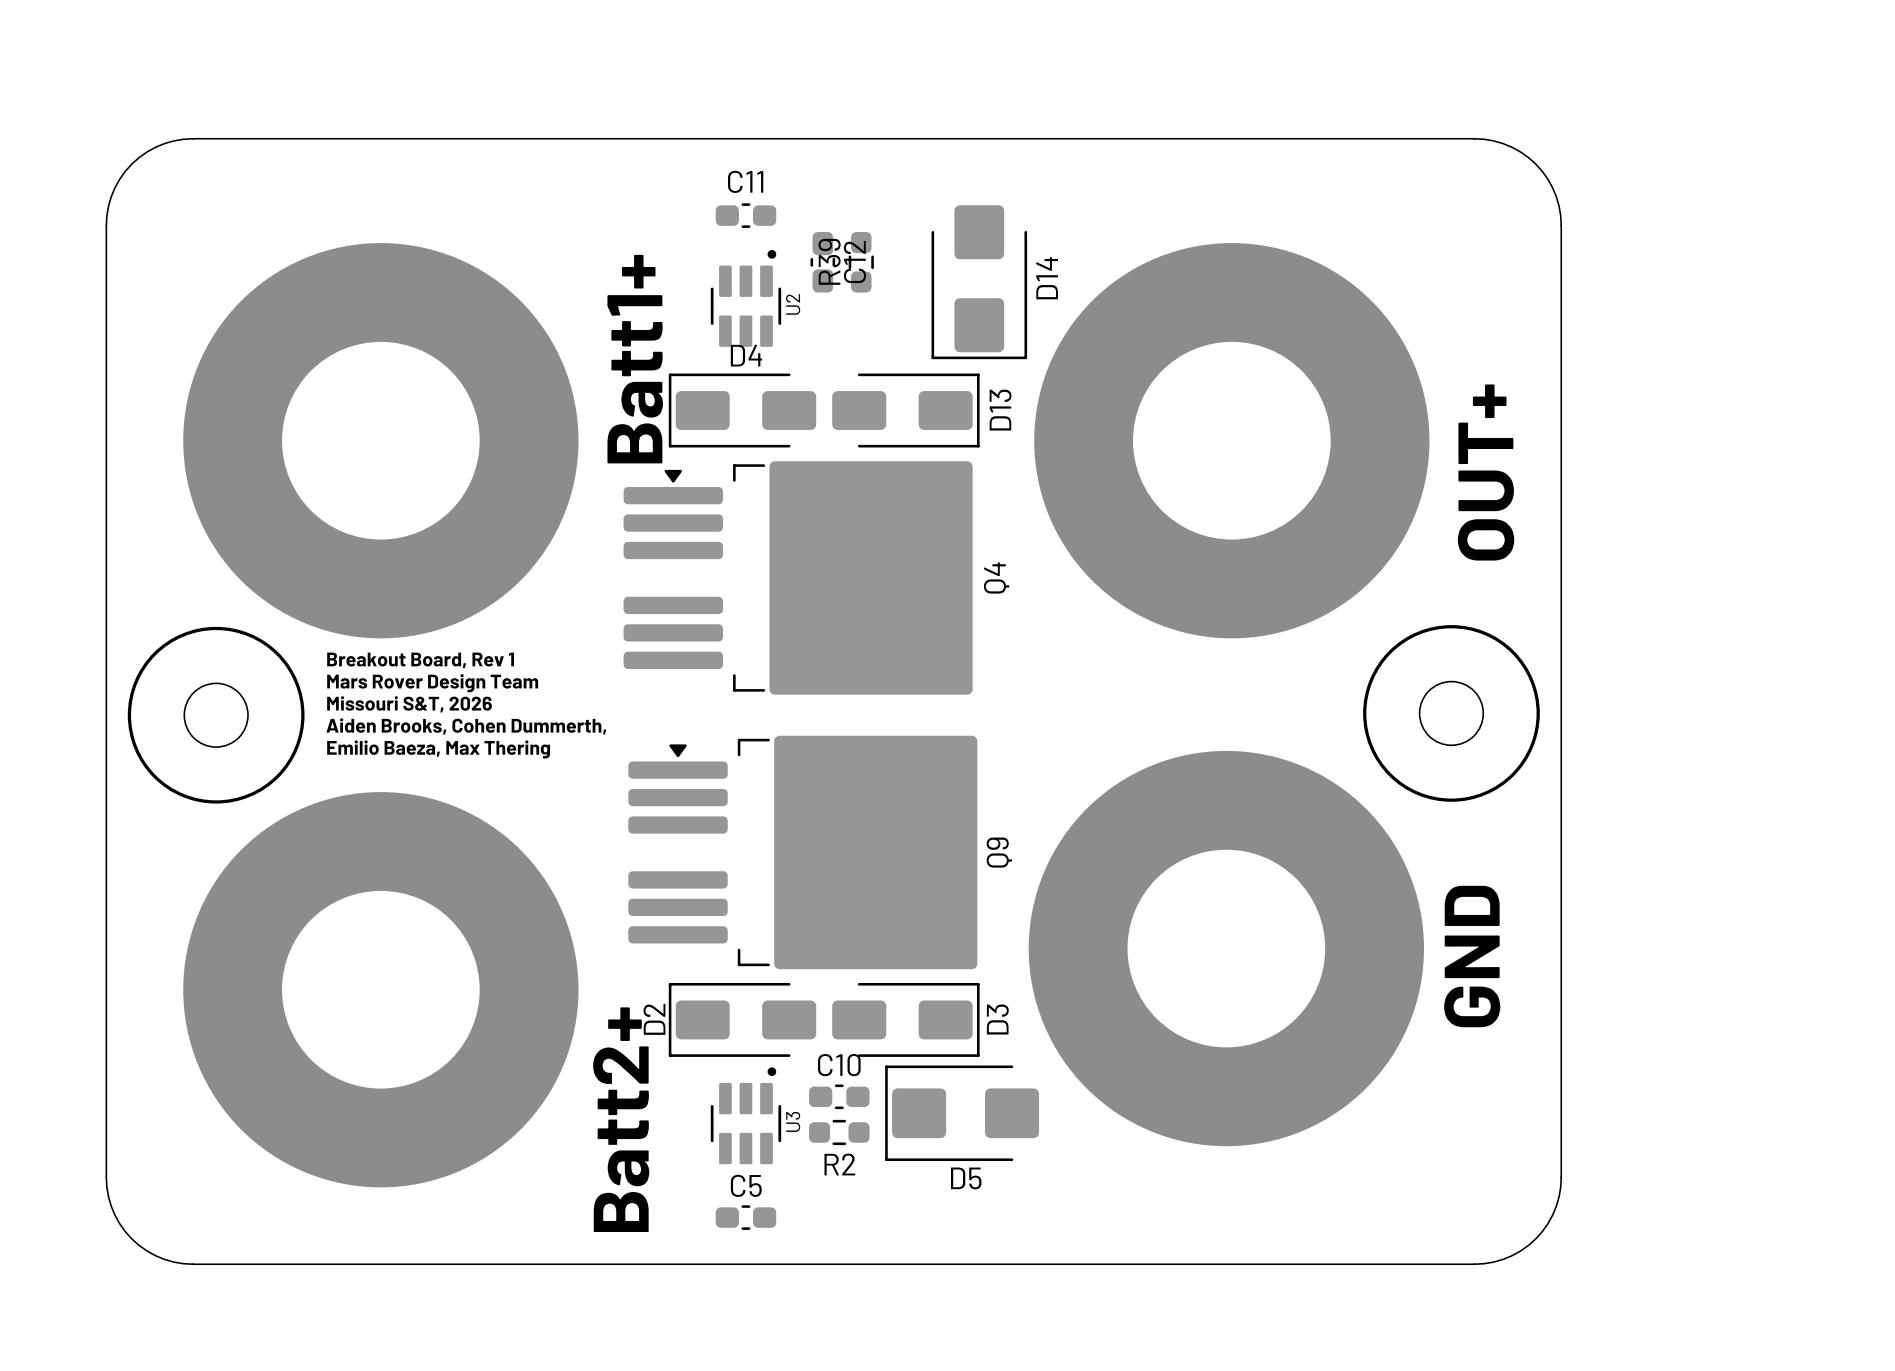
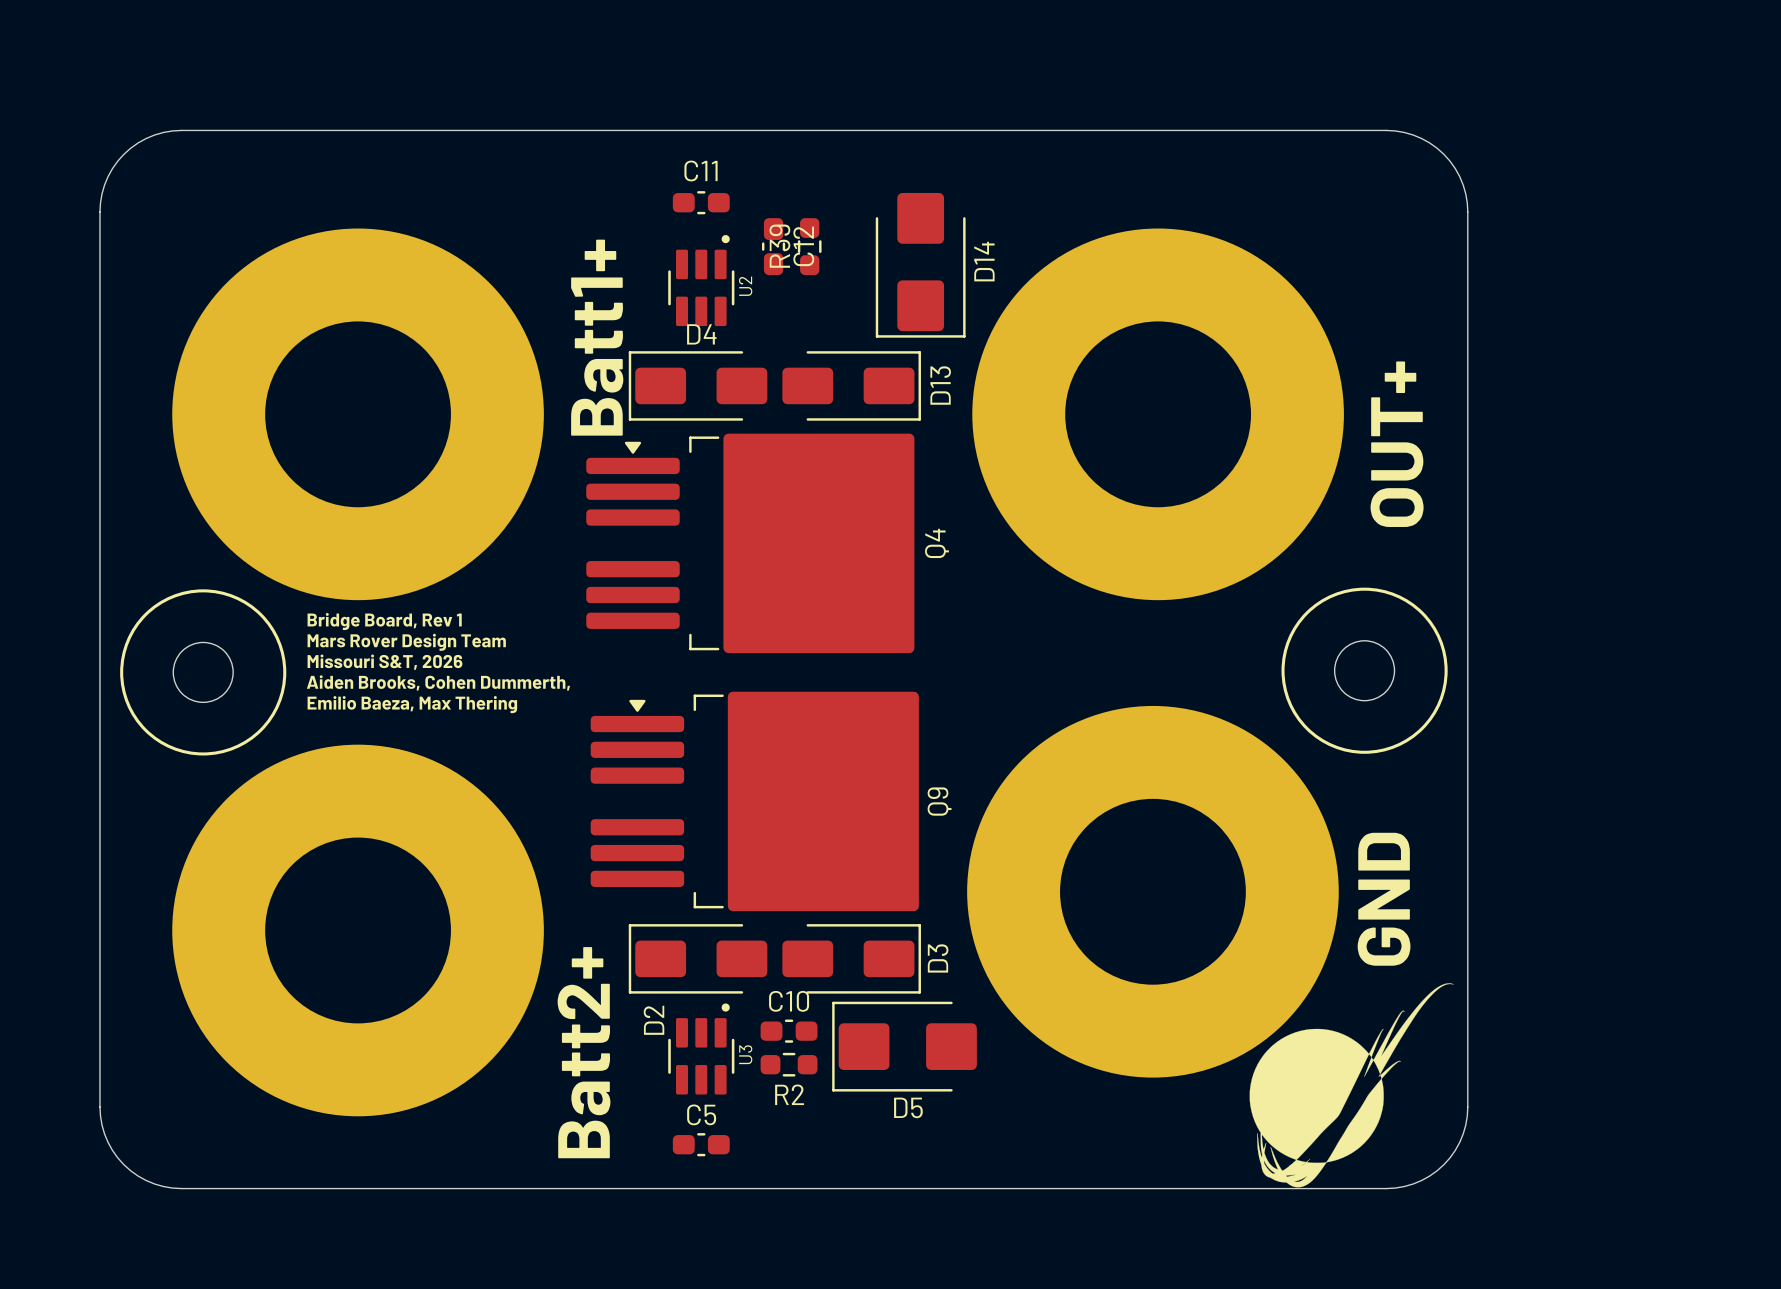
text: Breakout Board, Rev 1 (420, 660) -> Bridge Board, Rev 1 (384, 621)
D2 name position: D2 (654, 1019) -> D2 (653, 1020)
drawing: none -> [1249, 983, 1454, 1188]

